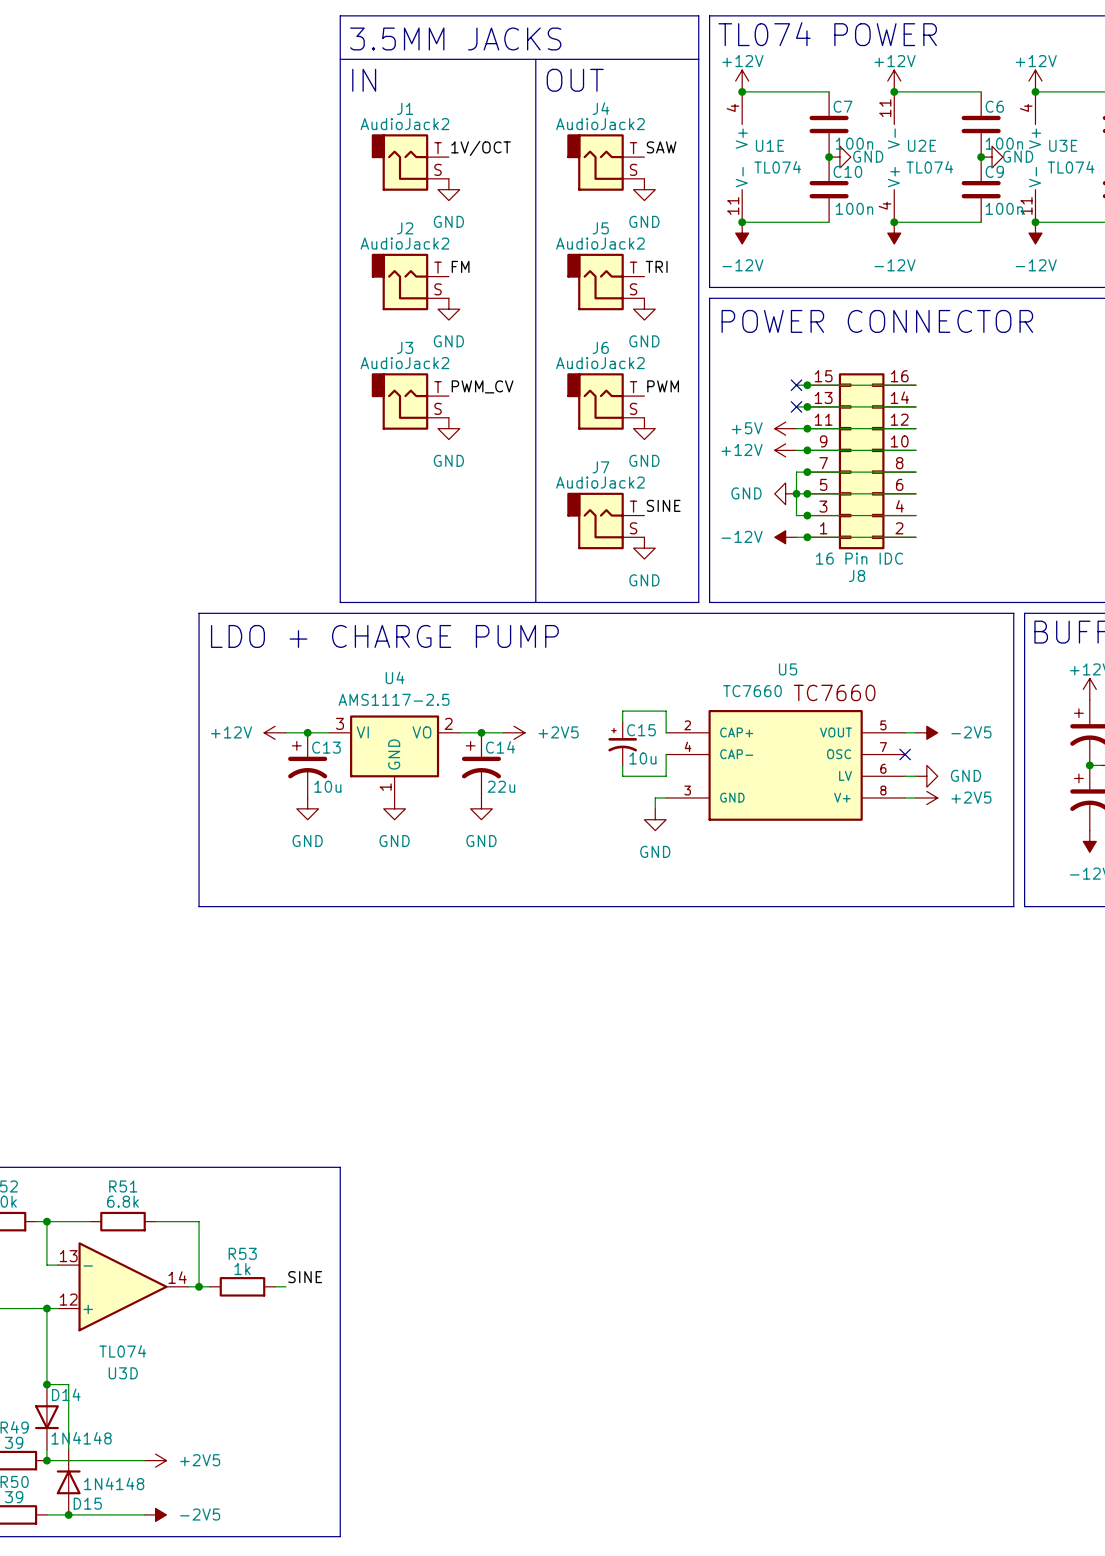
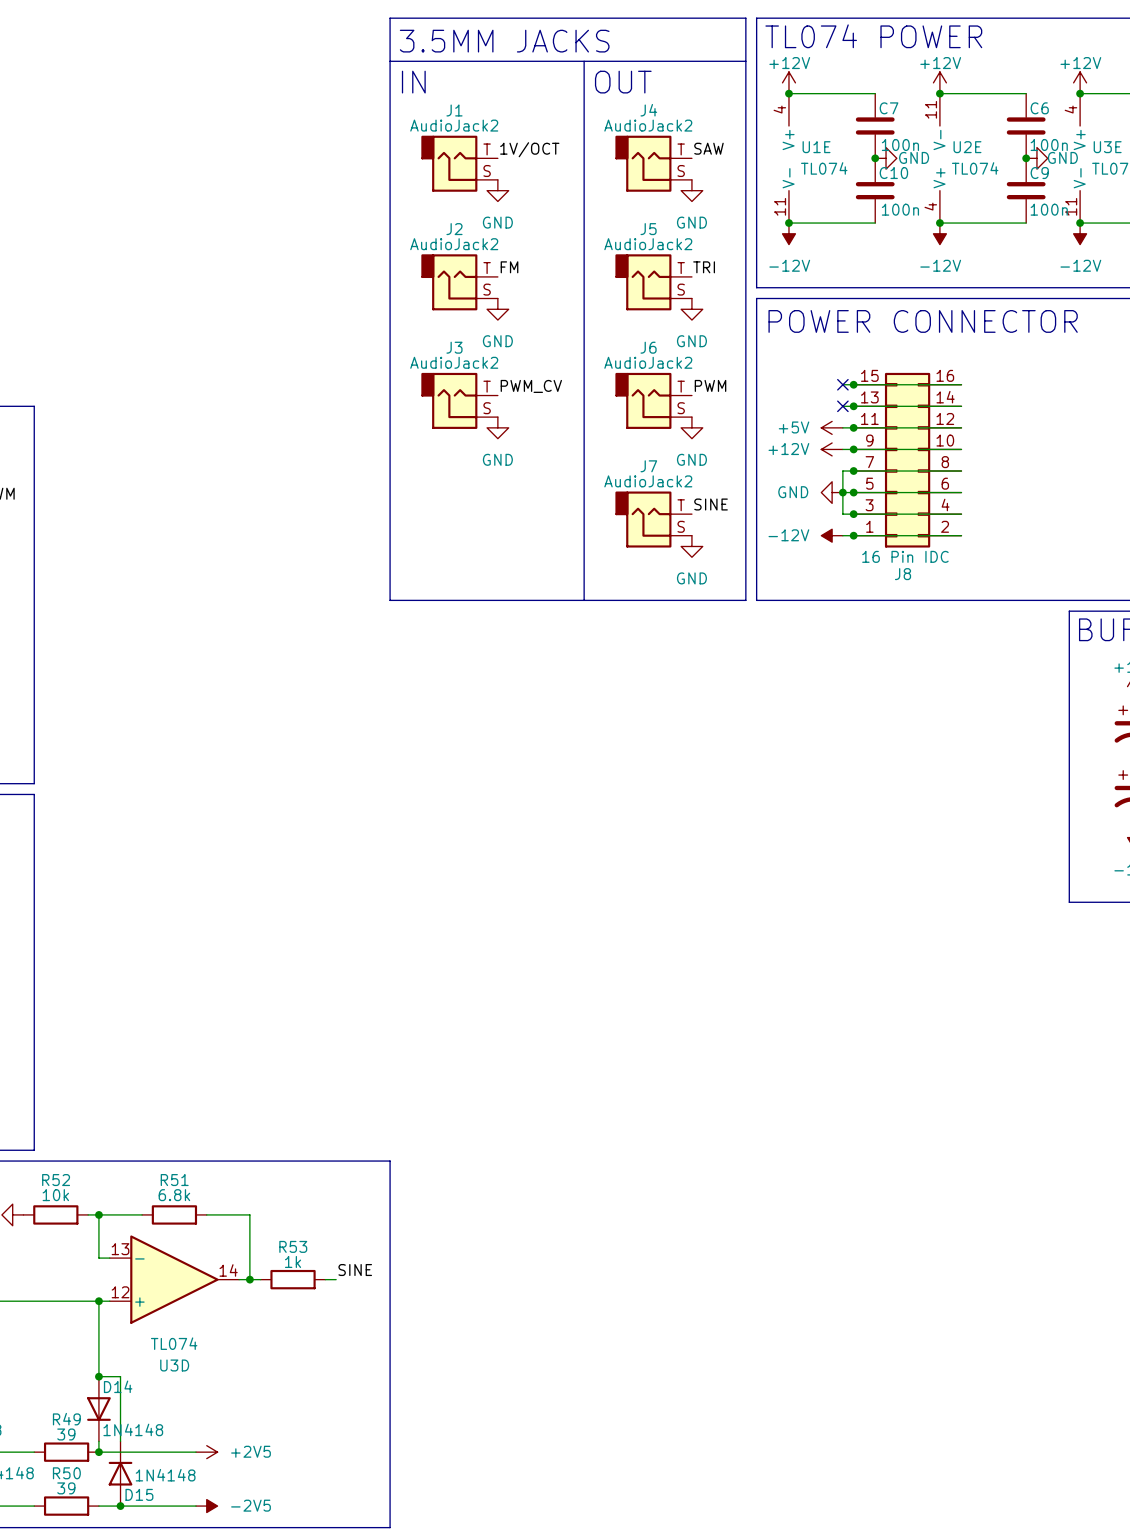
line: (199, 613) (1013, 613) (1013, 906) (199, 906) (199, 613) -> none
text: LDO + CHARGE PUMP (384, 636) -> none
wire: (622, 721) (622, 711) (666, 711) (666, 732) -> none
power symbol: +12V (275, 732) -> none
wire: (285, 732) (329, 732) -> none
junction: (307, 732) -> none
wire: (459, 732) (503, 732) -> none
junction: (481, 732) -> none
power symbol: +2V5 (514, 732) -> none
wire: (905, 732) (915, 732) -> none
power symbol: -2V5 (926, 732) -> none
C15: 10u (622, 743) -> none
wire: (666, 754) (666, 776) (622, 776) (622, 765) -> none
no-connect mark: (905, 754) -> none
U4: AMS1117-2.5 (394, 756) -> none
C13: 10u (307, 765) -> none
C14: 22u (481, 765) -> none
U5: TC7660 (785, 765) -> none
wire: (905, 776) (915, 776) -> none
power symbol: GND (926, 776) -> none
wire: (666, 797) (655, 797) (655, 808) -> none
wire: (905, 797) (915, 797) -> none
power symbol: +2V5 (926, 797) -> none
power symbol: GND (307, 808) -> none
power symbol: GND (394, 808) -> none
power symbol: GND (481, 808) -> none
power symbol: GND (655, 819) -> none

